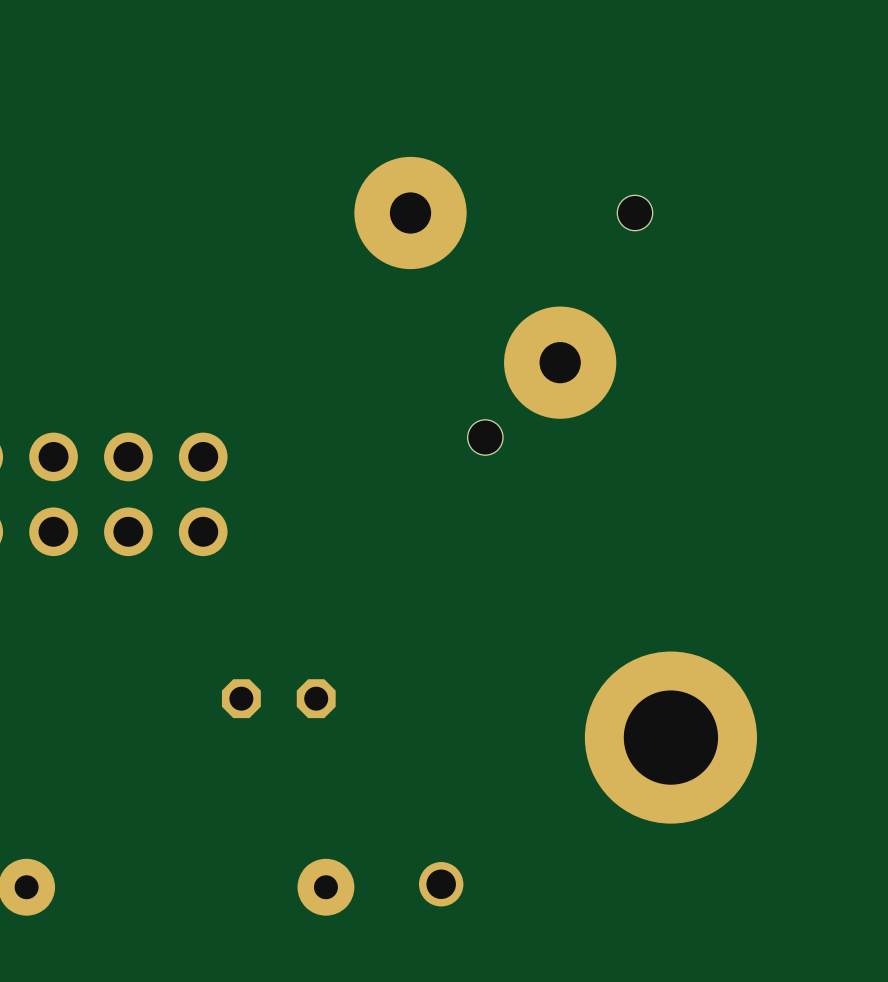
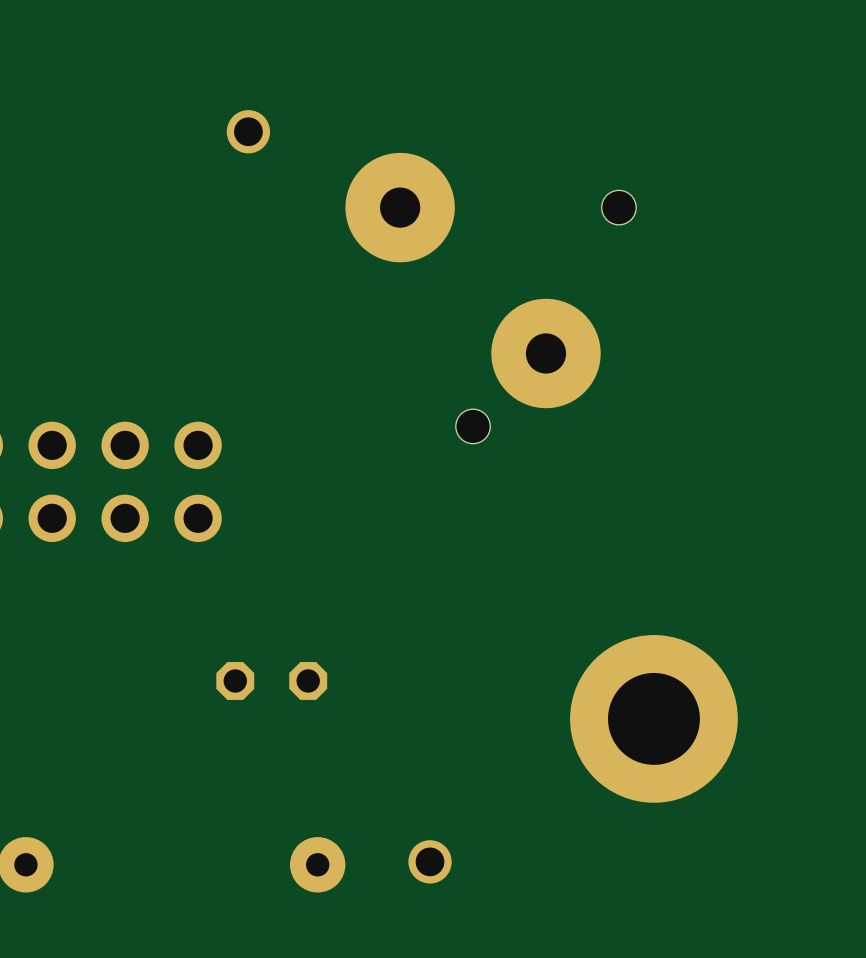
part: none -> (248, 131)

